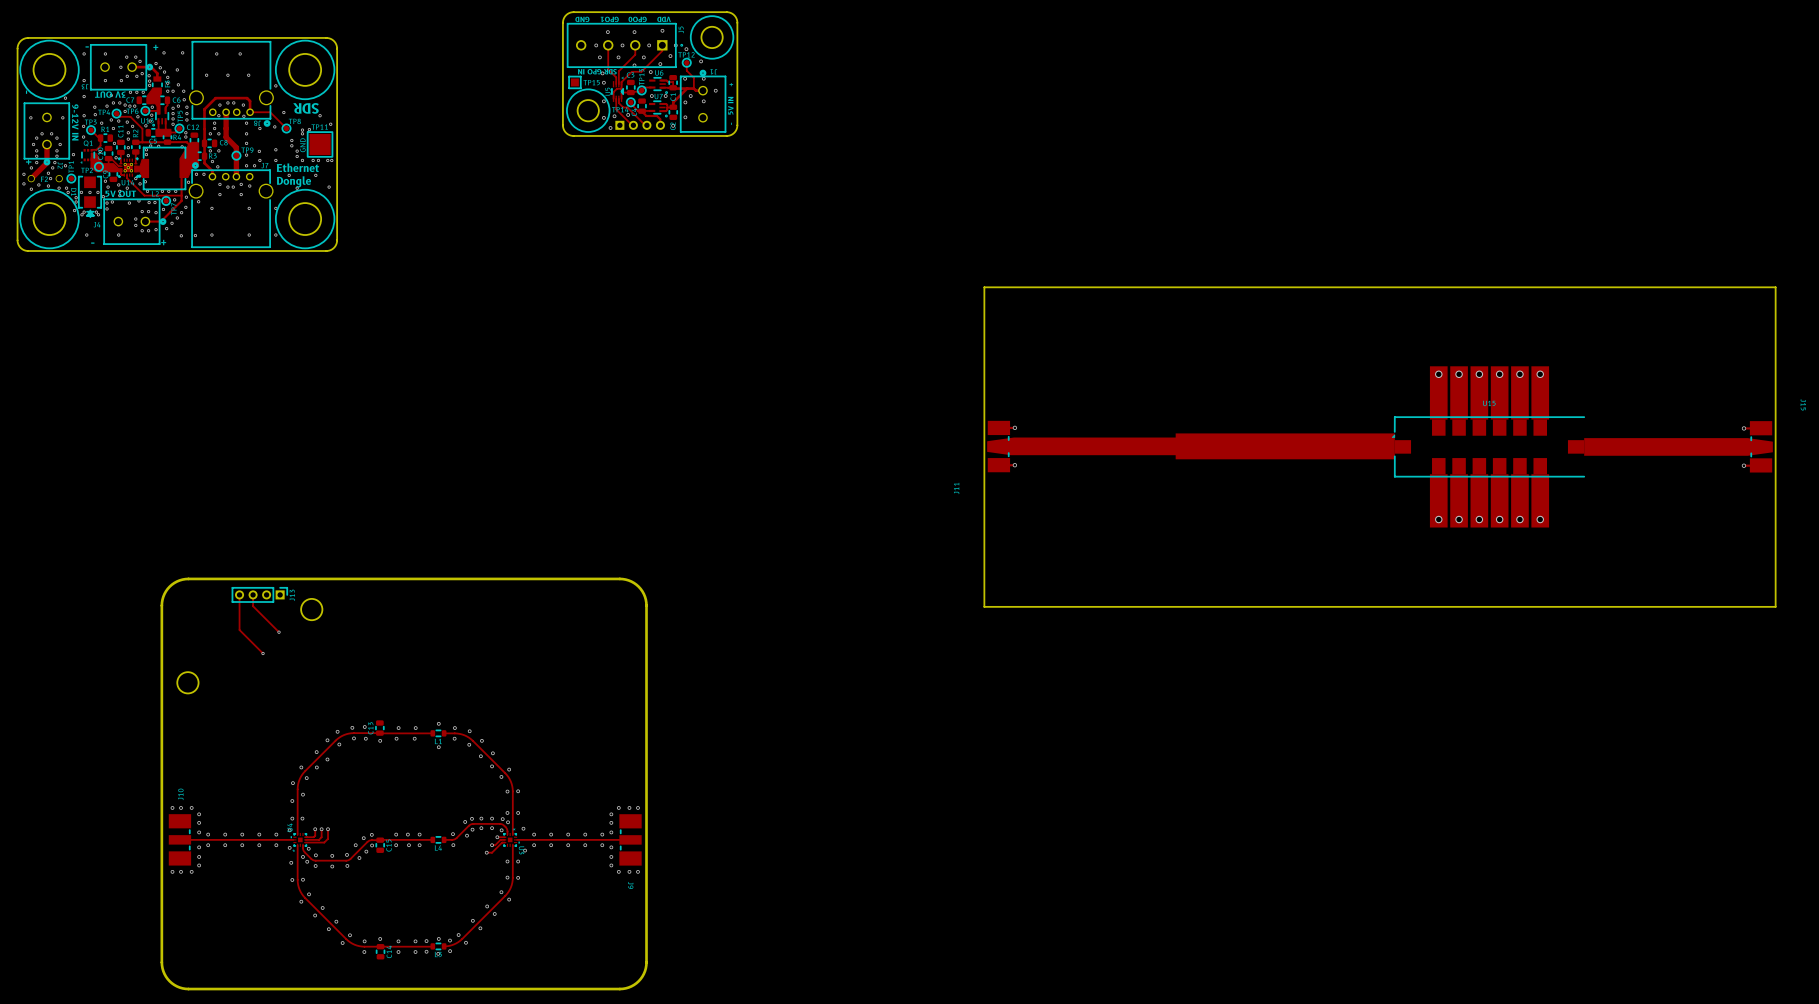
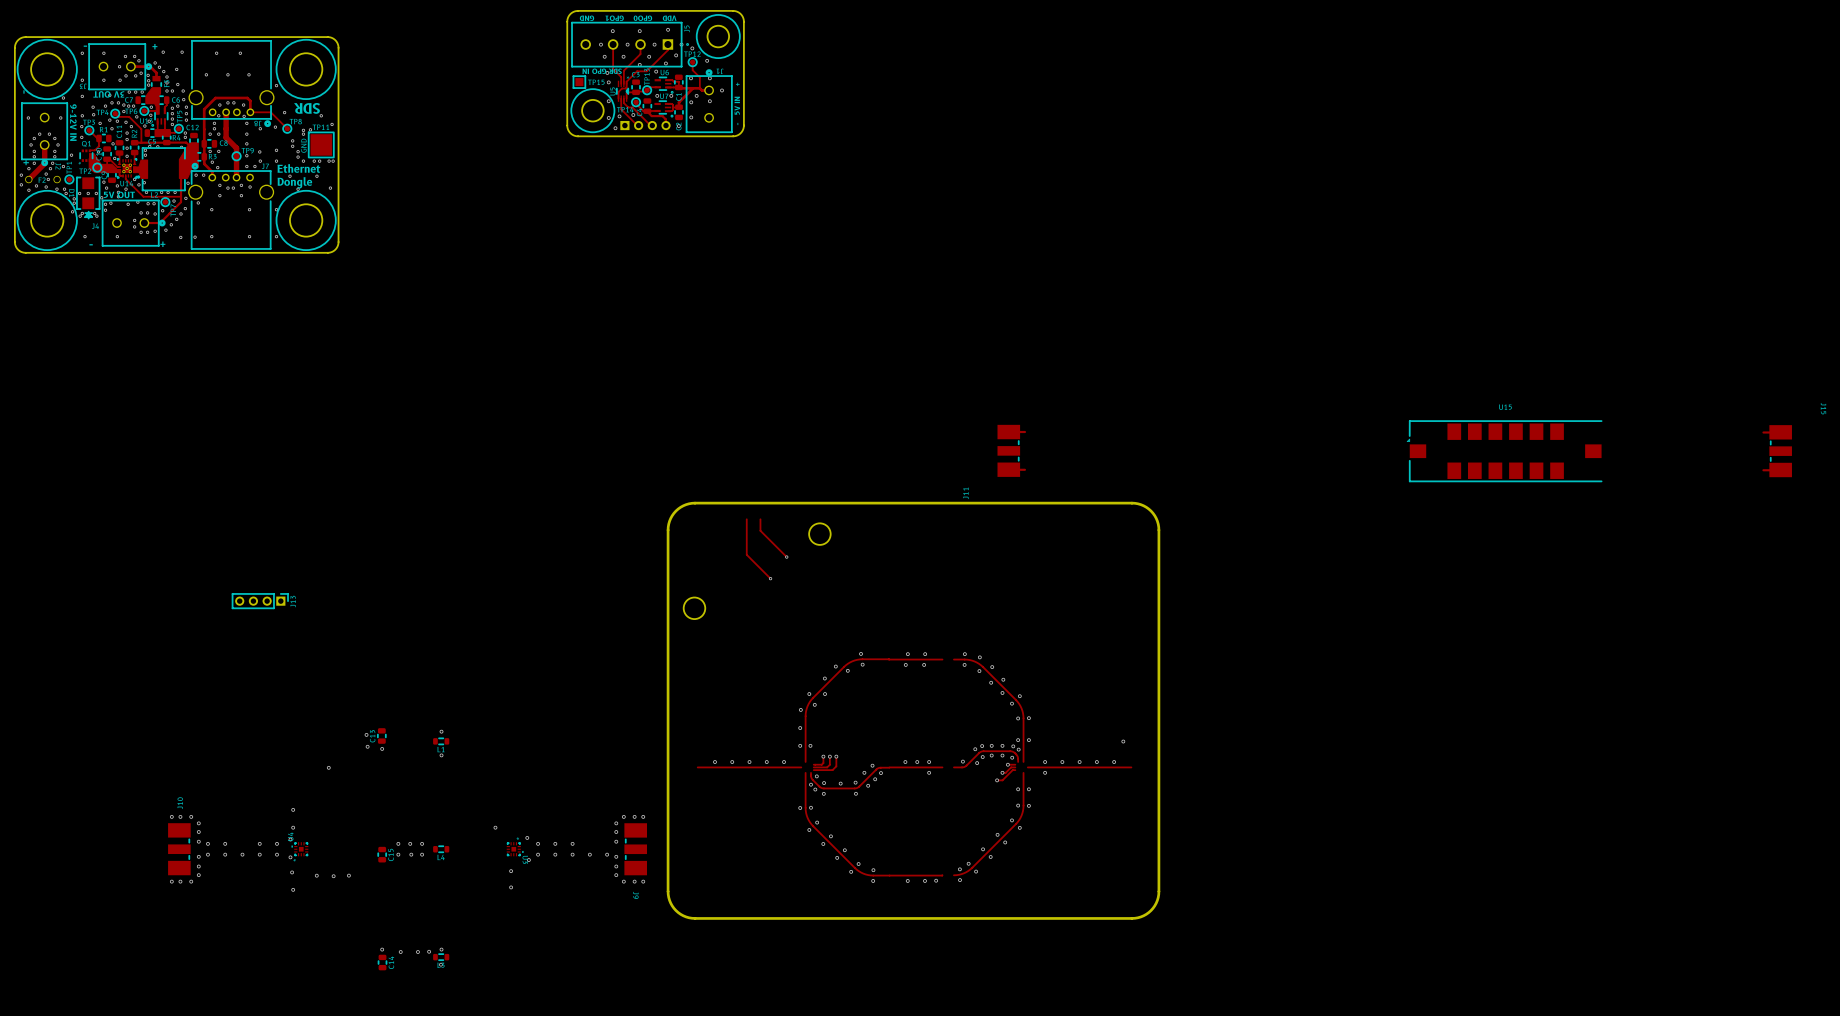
board edge: (984, 287) (1775, 287) (1775, 606) (984, 606) (984, 287) -> none
drawing: [1429, 366, 1550, 420] -> none
via: (1438, 374) -> none
via: (1459, 374) -> none
via: (1479, 374) -> none
via: (1499, 374) -> none
via: (1519, 374) -> none
via: (1540, 374) -> none
via: (1014, 427) -> none
via: (1744, 428) -> none
drawing: [987, 433, 1395, 460] -> none
drawing: [1584, 438, 1773, 456] -> none
via: (1014, 465) -> none
via: (1743, 465) -> none
drawing: [1429, 474, 1550, 528] -> none
board edge: none -> (695, 503) (1131, 503) (1140, 504) (1148, 509) (1156, 518) (1158, 530) (1158, 891) (1157, 900) (1153, 908) (1143, 915) (1131, 918) (695, 918) (686, 916) (678, 912) (670, 903) (668, 891) (668, 530) (669, 521) (675, 511) (683, 505) (695, 503)
track: none -> (746, 519) (746, 554) (770, 578)
track: none -> (760, 519) (760, 530) (786, 557)
round board edge: none -> [808, 522, 832, 546]
via: (1438, 519) -> none
via: (1459, 519) -> none
via: (1479, 519) -> none
via: (1499, 519) -> none
via: (1519, 519) -> none
via: (1540, 519) -> none
via: none -> (786, 557)
via: none -> (770, 578)
board edge: (188, 578) (619, 578) (636, 584) (643, 594) (646, 605) (646, 962) (640, 979) (631, 986) (619, 989) (188, 989) (171, 983) (164, 973) (161, 962) (161, 605) (164, 594) (169, 586) (176, 581) (188, 578) -> none
round board edge: none -> [683, 596, 706, 620]
track: (239, 594) (239, 630) (263, 653) -> none
track: (253, 594) (253, 606) (279, 632) -> none
round board edge: [300, 598, 323, 621] -> none
via: (279, 632) -> none
via: none -> (861, 653)
via: none -> (907, 654)
via: none -> (925, 654)
via: none -> (964, 654)
via: none -> (979, 657)
track: none -> (942, 659) (859, 659) (845, 665) (813, 697) (807, 706) (805, 716) (805, 761)
track: none -> (953, 659) (969, 660) (979, 663) (1019, 703) (1023, 715) (1023, 761)
via: (263, 653) -> none
via: none -> (862, 664)
via: none -> (905, 664)
via: none -> (924, 664)
via: none -> (964, 664)
via: none -> (835, 666)
via: none -> (992, 667)
via: none -> (847, 670)
via: none -> (979, 671)
round board edge: [176, 671, 200, 694] -> none
via: none -> (824, 678)
via: none -> (1003, 679)
via: none -> (991, 682)
via: none -> (1002, 692)
via: none -> (809, 694)
via: none -> (825, 694)
via: none -> (1019, 696)
via: none -> (1011, 703)
via: none -> (814, 704)
via: none -> (800, 709)
via: none -> (1018, 718)
via: none -> (1028, 718)
via: none -> (800, 728)
via: (352, 727) -> none
via: (398, 728) -> none
via: (415, 728) -> none
via: (454, 728) -> none
via: (337, 731) -> none
via: (469, 731) -> none
via: none -> (1018, 740)
via: none -> (1028, 740)
track: (432, 733) (351, 733) (337, 738) (305, 771) (299, 779) (297, 789) (297, 834) -> none
track: (444, 733) (459, 733) (469, 737) (508, 777) (512, 788) (512, 834) -> none
via: none -> (1123, 741)
via: none -> (800, 745)
via: none -> (810, 745)
via: none -> (991, 745)
via: none -> (1002, 745)
via: (353, 738) -> none
via: (396, 738) -> none
via: (414, 738) -> none
via: (454, 738) -> none
via: none -> (982, 746)
via: none -> (1013, 746)
via: (327, 740) -> none
via: (481, 740) -> none
via: none -> (975, 749)
via: none -> (1018, 749)
via: (339, 744) -> none
via: (469, 744) -> none
via: none -> (991, 755)
via: none -> (1002, 755)
track: none -> (823, 756) (821, 764) (813, 764)
via: none -> (823, 756)
track: none -> (829, 756) (829, 764) (827, 767) (813, 767)
via: none -> (829, 756)
track: none -> (836, 756) (836, 766) (832, 770) (813, 770)
via: none -> (836, 756)
via: none -> (982, 757)
via: none -> (1012, 757)
via: (316, 752) -> none
via: (492, 753) -> none
via: none -> (714, 762)
via: none -> (732, 762)
via: none -> (749, 762)
via: none -> (766, 762)
via: none -> (784, 762)
via: none -> (905, 762)
via: none -> (917, 762)
via: none -> (929, 762)
via: none -> (962, 761)
track: none -> (1018, 761) (1017, 755) (1012, 751) (982, 751) (965, 766) (953, 767)
via: none -> (1045, 762)
via: none -> (1062, 762)
via: none -> (1079, 762)
via: none -> (1096, 762)
via: none -> (1114, 762)
via: none -> (977, 763)
via: (480, 756) -> none
track: none -> (1007, 764) (1015, 764)
via: none -> (1007, 764)
via: none -> (872, 765)
track: none -> (697, 767) (801, 767)
track: none -> (889, 767) (877, 768) (855, 788) (821, 787) (812, 779) (811, 772)
track: none -> (889, 767) (942, 767)
track: none -> (1015, 767) (1011, 767) (1005, 772) (1002, 772)
track: none -> (1027, 767) (1131, 767)
track: none -> (1015, 770) (1012, 770) (1002, 780) (997, 780)
track: none -> (805, 772) (805, 810) (808, 820) (856, 869) (870, 875) (942, 875)
via: none -> (864, 772)
via: none -> (880, 773)
via: none -> (929, 772)
via: none -> (1002, 772)
track: none -> (1023, 772) (1023, 808) (1019, 820) (970, 869) (953, 875)
via: none -> (1045, 772)
via: (492, 766) -> none
via: (301, 767) -> none
via: (316, 767) -> none
via: none -> (816, 776)
via: (509, 769) -> none
via: none -> (875, 779)
via: none -> (997, 780)
via: none -> (824, 783)
via: none -> (855, 782)
via: none -> (840, 783)
via: (501, 776) -> none
via: none -> (811, 784)
via: none -> (868, 785)
via: (306, 778) -> none
via: none -> (815, 789)
via: none -> (1018, 789)
via: none -> (1028, 789)
via: (292, 783) -> none
via: none -> (823, 793)
via: none -> (855, 793)
via: (507, 791) -> none
via: (518, 791) -> none
via: (302, 794) -> none
via: none -> (1018, 805)
via: none -> (1028, 805)
via: none -> (811, 807)
via: none -> (800, 808)
via: none -> (1011, 820)
via: (507, 812) -> none
via: (518, 812) -> none
via: none -> (817, 822)
via: (302, 818) -> none
via: (471, 818) -> none
via: (481, 818) -> none
via: none -> (1019, 827)
via: (502, 819) -> none
via: none -> (809, 830)
via: (465, 821) -> none
via: (508, 822) -> none
via: none -> (997, 834)
via: none -> (830, 836)
via: (481, 828) -> none
via: (492, 828) -> none
track: (315, 829) (313, 837) (305, 837) -> none
via: (315, 829) -> none
track: (321, 829) (321, 837) (318, 839) (305, 839) -> none
via: (321, 829) -> none
track: (328, 829) (328, 838) (324, 842) (305, 842) -> none
via: (328, 829) -> none
via: (472, 829) -> none
via: (501, 830) -> none
via: none -> (1005, 842)
via: (242, 834) -> none
via: (371, 834) -> none
via: (452, 834) -> none
track: (507, 834) (506, 828) (501, 824) (472, 823) (455, 839) (444, 839) -> none
via: (585, 834) -> none
via: (602, 834) -> none
via: none -> (823, 843)
via: (467, 835) -> none
track: (497, 837) (504, 837) -> none
via: (497, 837) -> none
via: (363, 838) -> none
track: (191, 839) (293, 839) -> none
track: (380, 839) (432, 839) -> none
track: (504, 839) (500, 839) (495, 845) (492, 845) -> none
track: (517, 839) (619, 839) -> none
via: none -> (983, 849)
track: (380, 840) (368, 841) (346, 860) (313, 860) (304, 851) (302, 845) -> none
via: none -> (844, 850)
track: (504, 842) (502, 842) (492, 852) (486, 852) -> none
track: (297, 845) (297, 882) (300, 891) (348, 940) (361, 946) (432, 946) -> none
via: (355, 845) -> none
via: (372, 845) -> none
via: (453, 845) -> none
via: (492, 845) -> none
track: (512, 845) (512, 880) (508, 892) (460, 940) (444, 946) -> none
via: none -> (990, 856)
via: (308, 848) -> none
via: none -> (837, 857)
via: (366, 851) -> none
via: (486, 852) -> none
via: (346, 854) -> none
via: none -> (858, 864)
via: none -> (968, 863)
via: (315, 855) -> none
via: (332, 855) -> none
via: (302, 856) -> none
via: (359, 858) -> none
via: none -> (959, 869)
via: none -> (873, 870)
via: (307, 861) -> none
via: (518, 861) -> none
via: none -> (976, 871)
via: none -> (851, 871)
via: none -> (936, 880)
via: none -> (960, 880)
via: none -> (873, 880)
via: none -> (907, 880)
via: none -> (924, 880)
via: (518, 877) -> none
via: (302, 879) -> none
via: (501, 892) -> none
via: (309, 894) -> none
via: (509, 899) -> none
via: (301, 901) -> none
via: (487, 906) -> none
via: (322, 907) -> none
via: (494, 913) -> none
via: (315, 915) -> none
via: (472, 920) -> none
via: (336, 921) -> none
via: (480, 928) -> none
via: (328, 929) -> none
via: (349, 935) -> none
via: (458, 935) -> none
via: (449, 940) -> none
via: (364, 941) -> none
via: (465, 942) -> none
via: (342, 943) -> none
via: (426, 951) -> none
via: (450, 951) -> none
via: (364, 952) -> none
via: (398, 952) -> none
via: (415, 952) -> none

